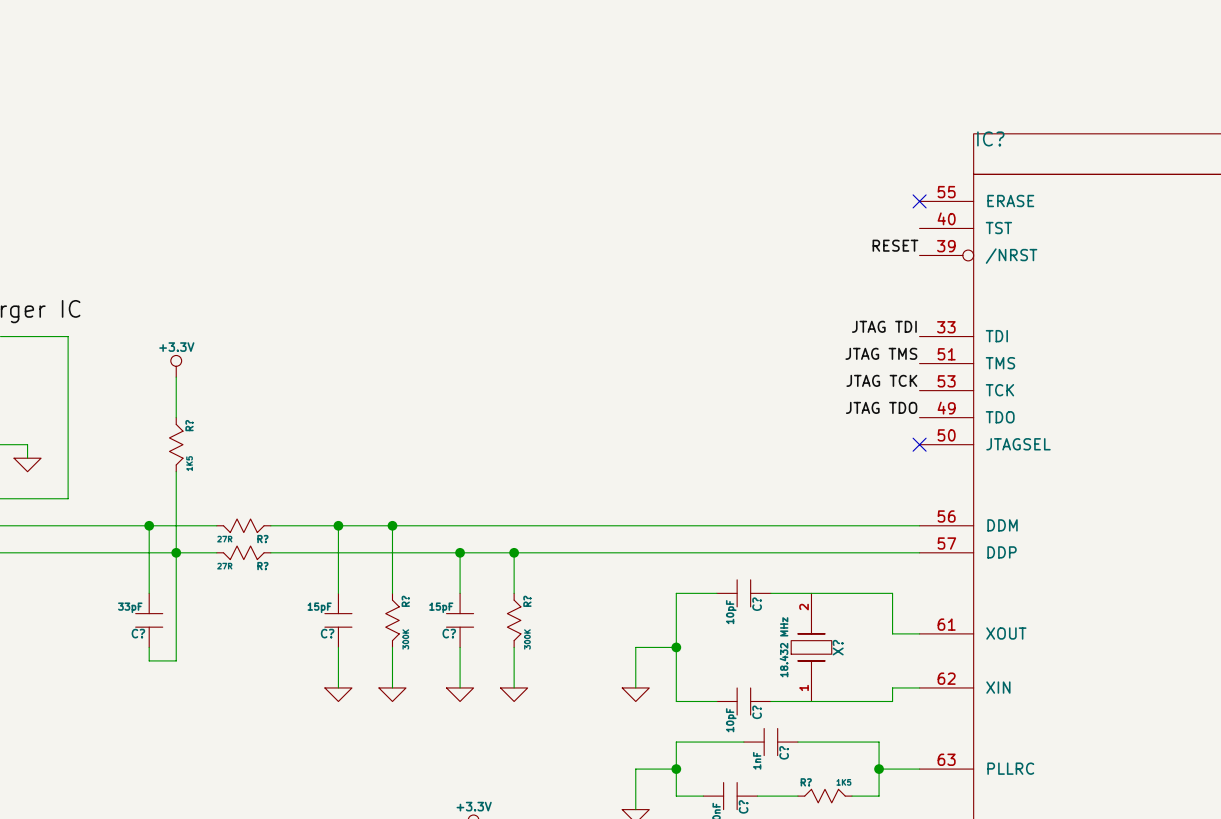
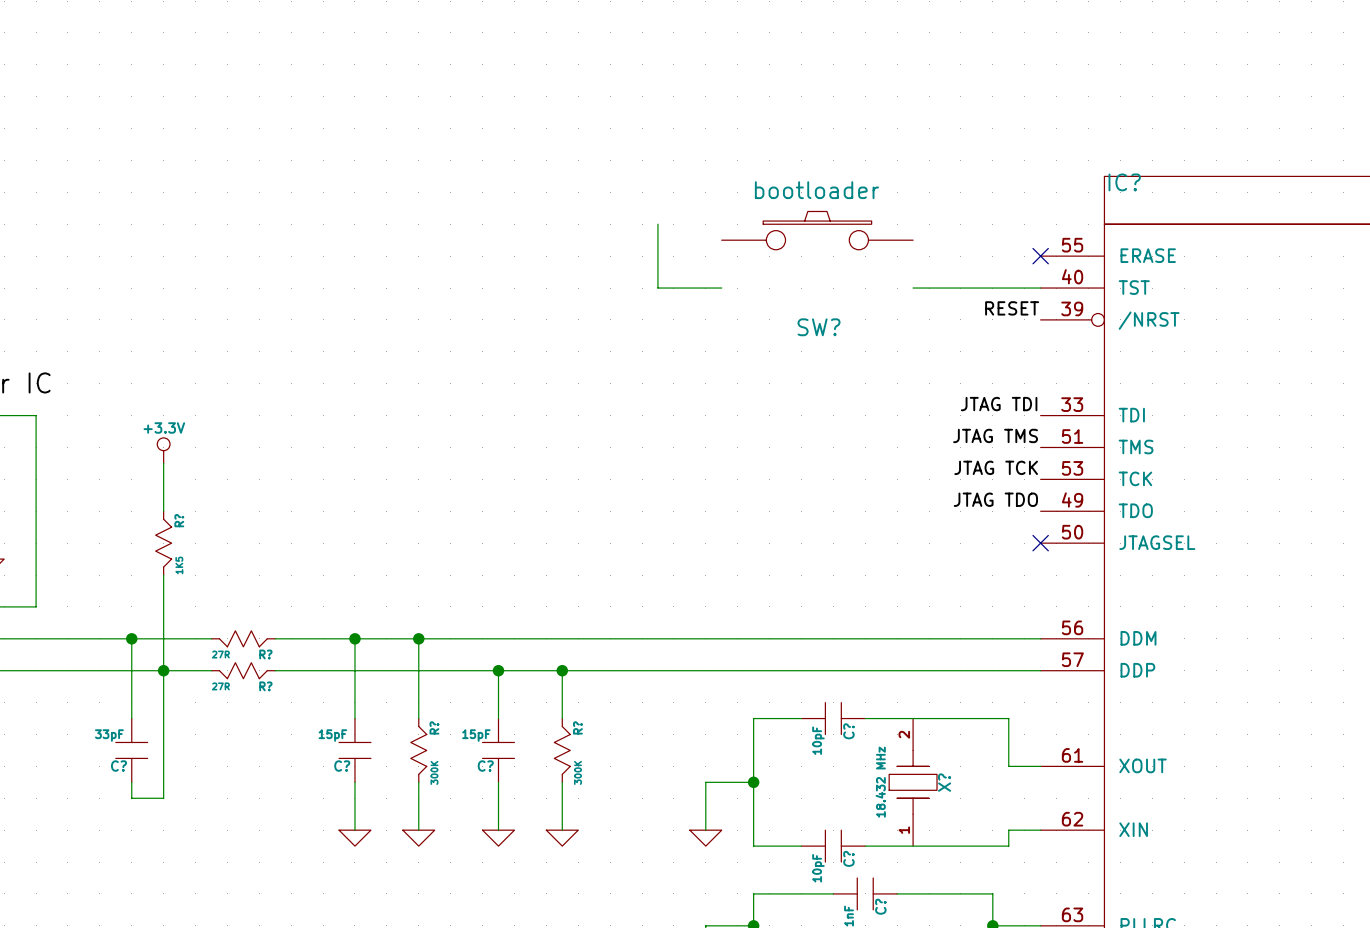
wire: none -> (657, 224) (657, 288) (721, 288)
SW?: none -> bootloader (817, 230)
wire: none -> (913, 288) (1040, 288)

